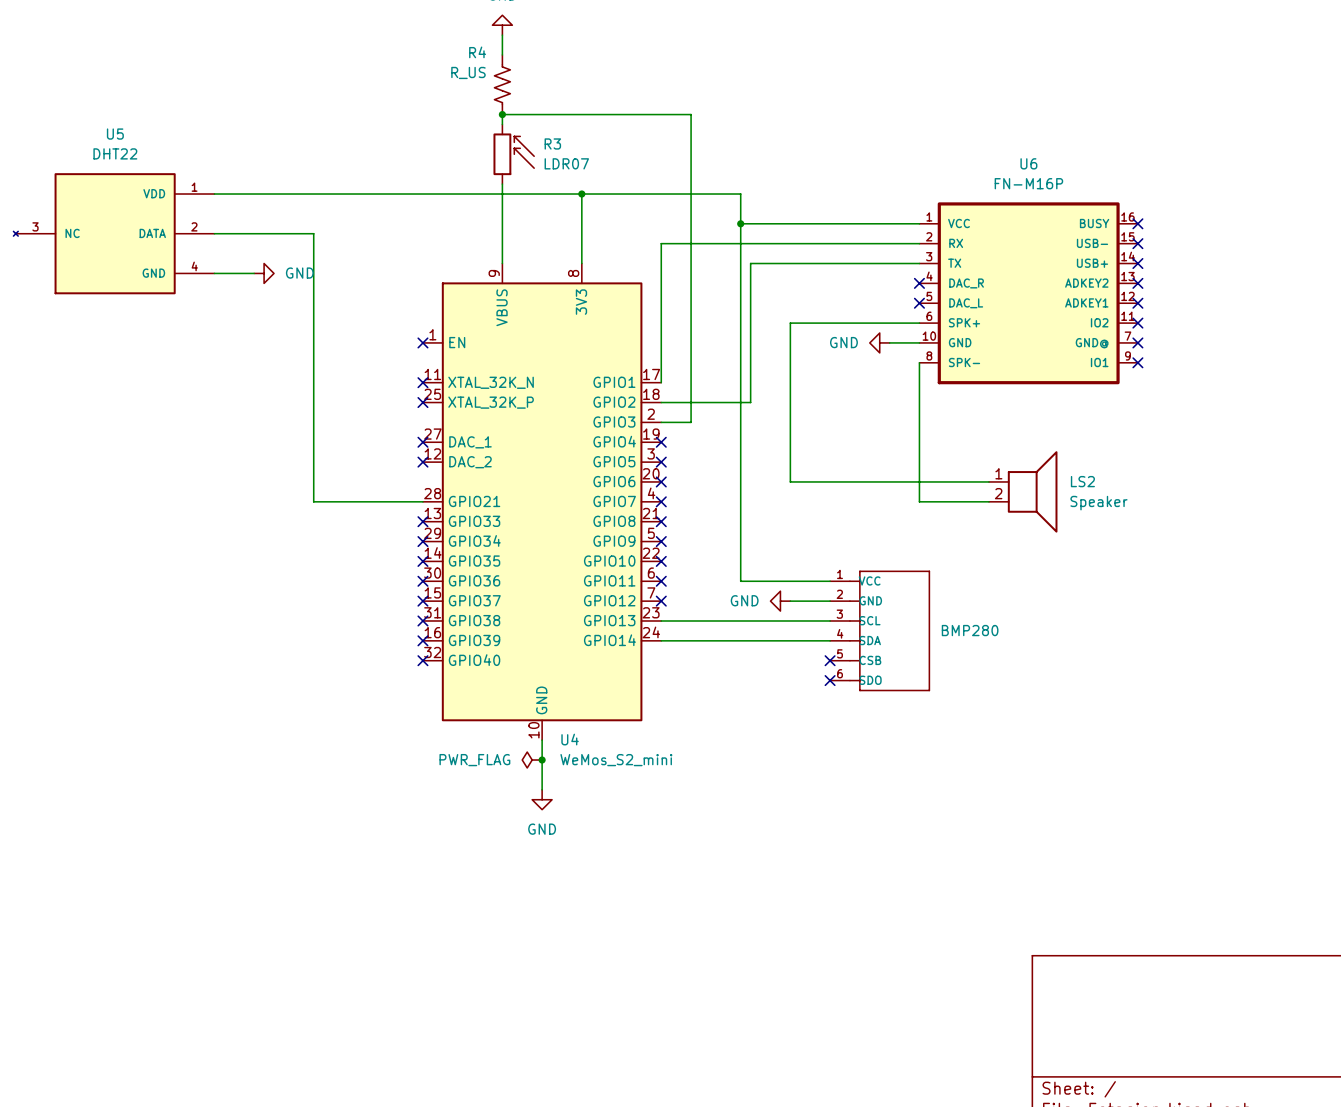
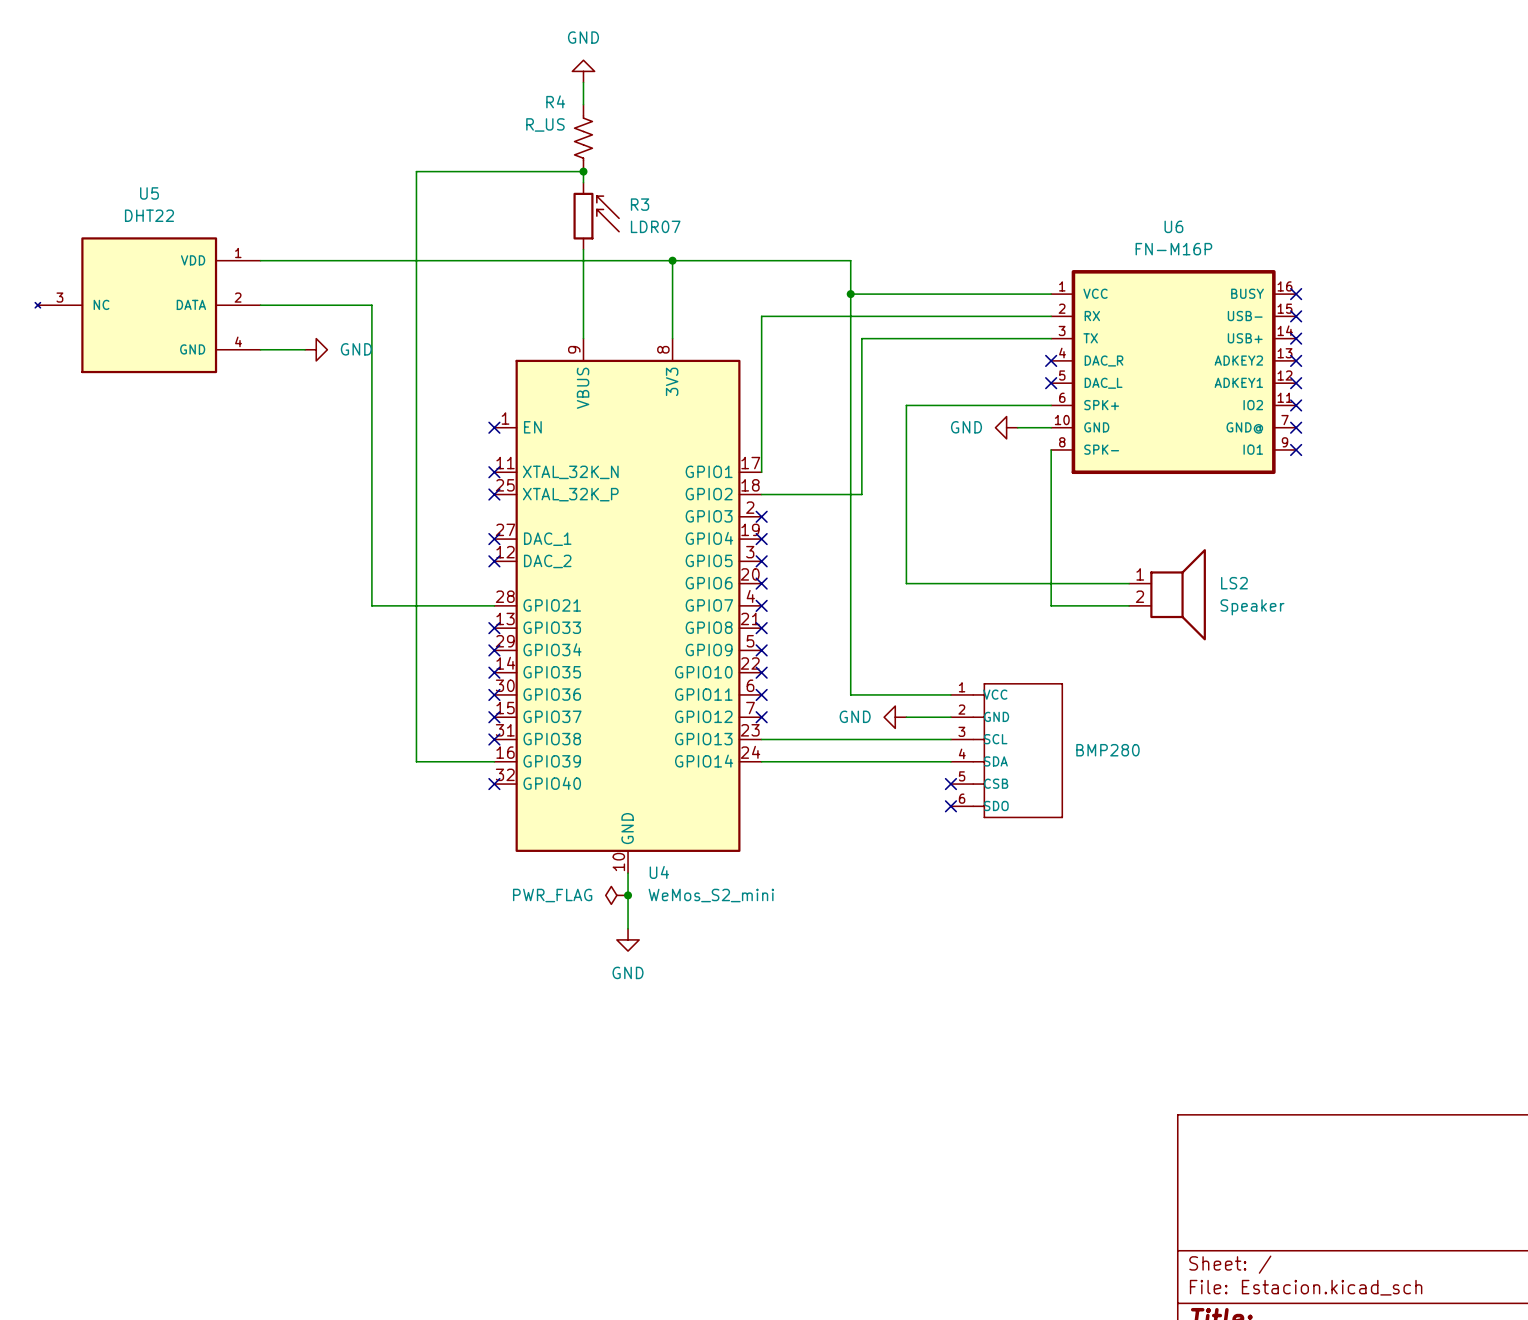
wire: (502, 114) (691, 114) (691, 422) (661, 422) -> (583, 171) (416, 171) (416, 761) (494, 761)
no-connect mark: none -> (761, 516)
no-connect mark: (422, 640) -> none

